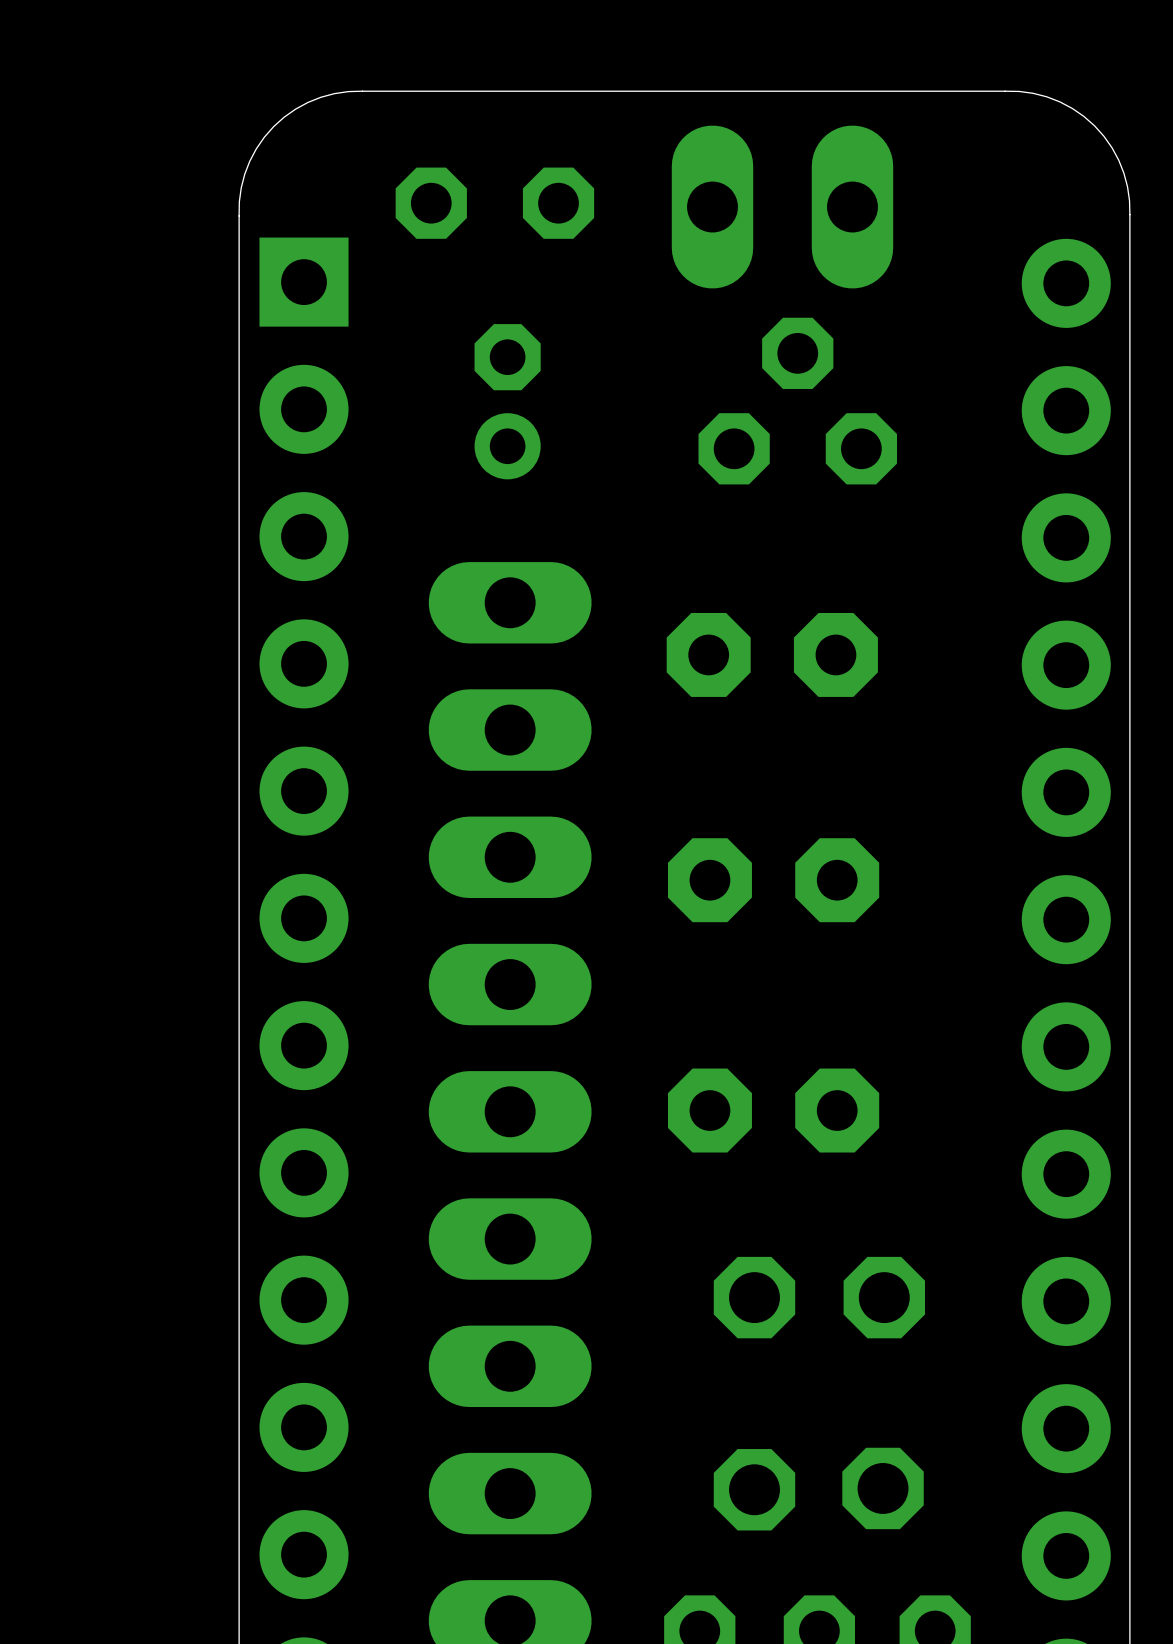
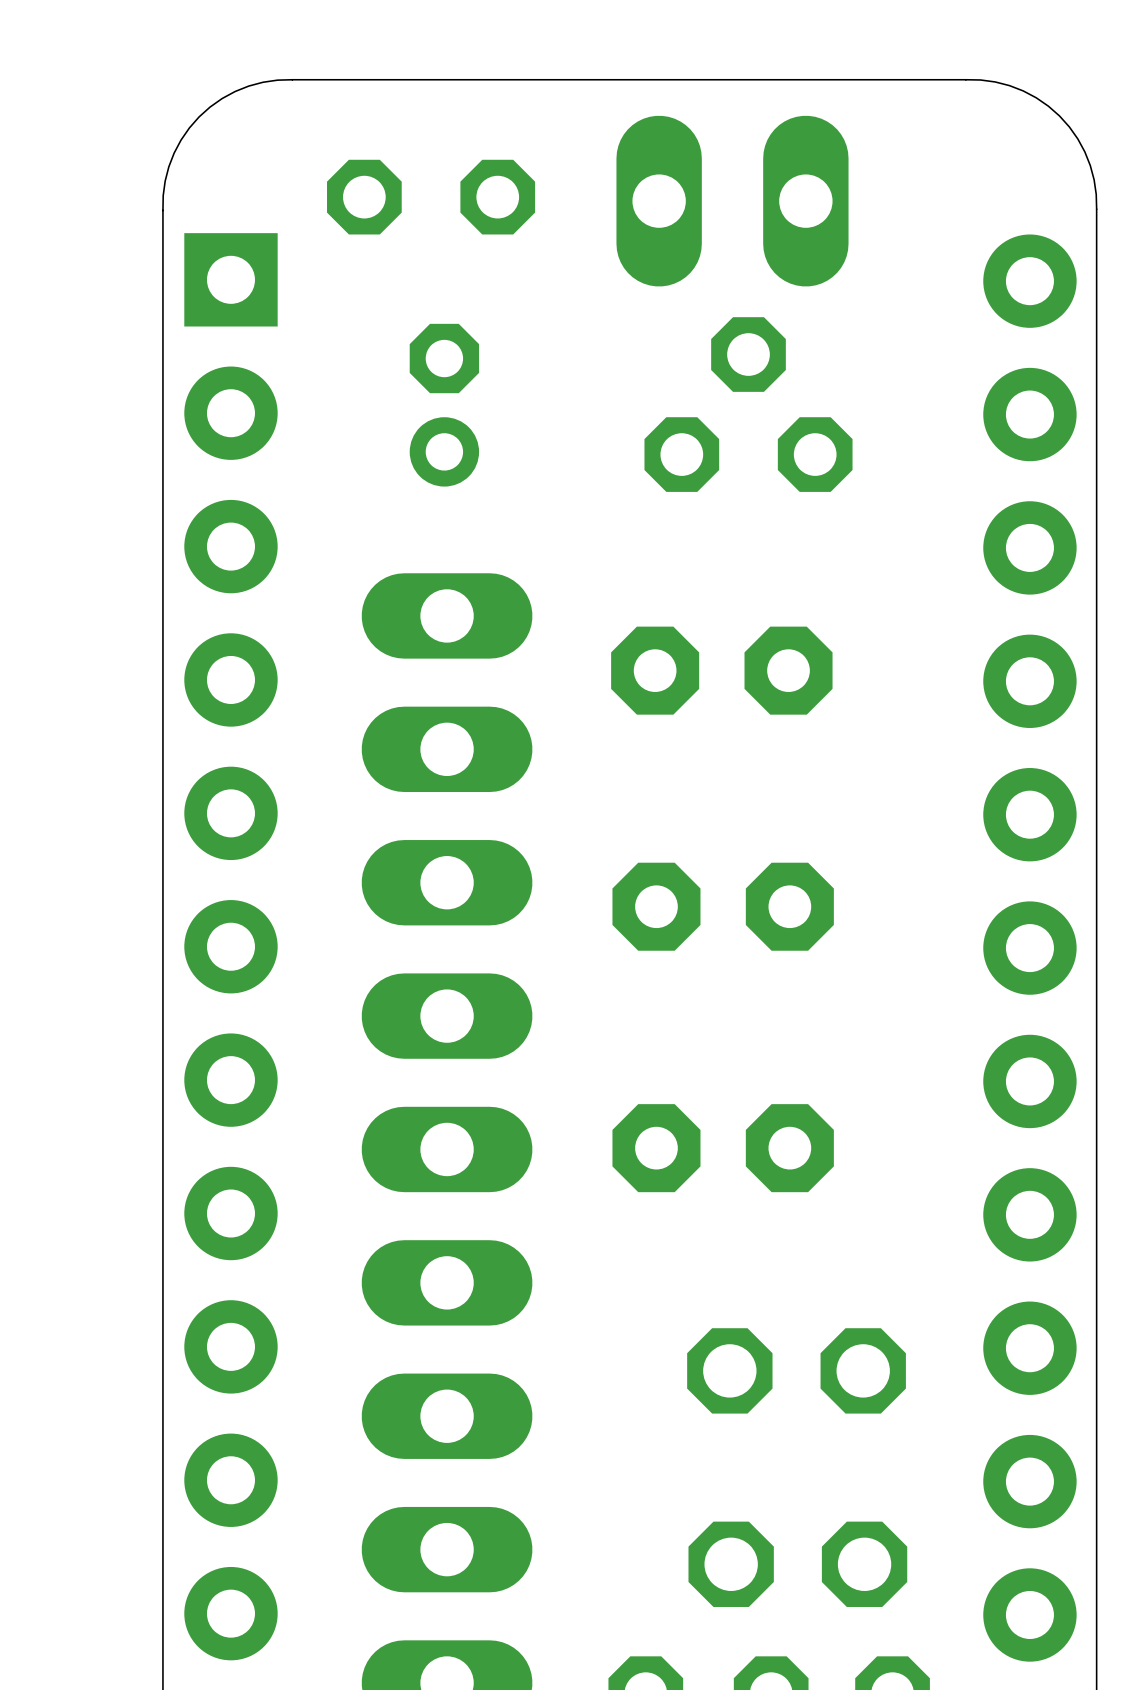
part position: (754, 1297) -> (729, 1370)
part position: (884, 1297) -> (863, 1370)
part position: (883, 1488) -> (864, 1564)
part position: (754, 1489) -> (731, 1564)

